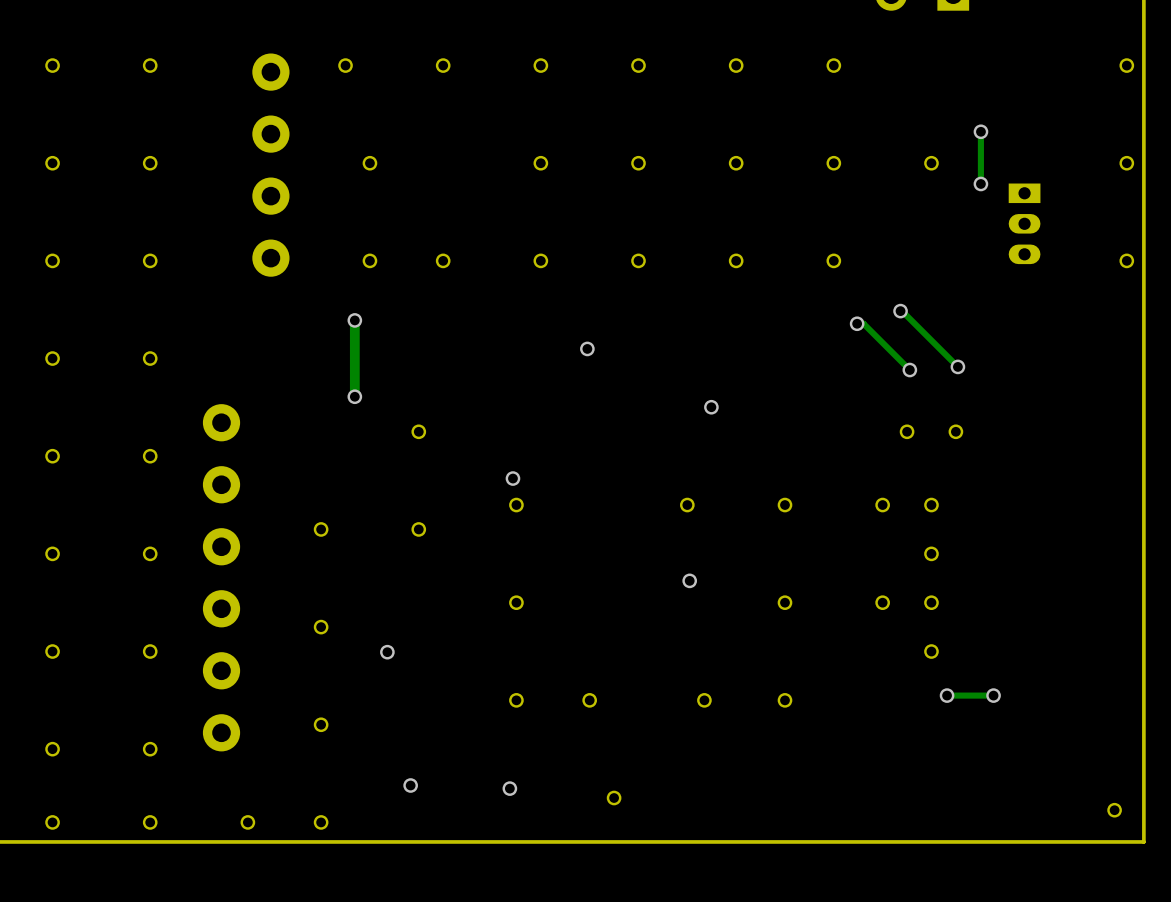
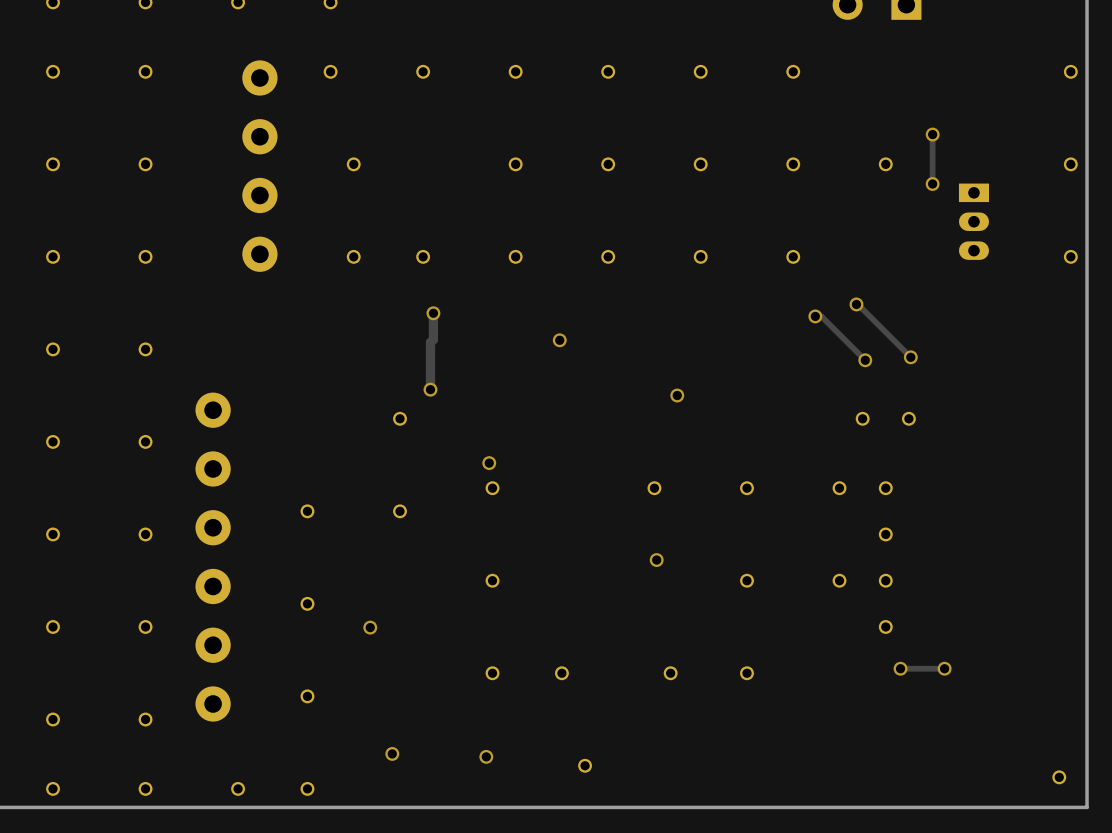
track: (354, 320) (354, 396) -> none
via: (354, 320) -> none
track: none -> (433, 313) (433, 339) (430, 342) (430, 389)
via: none -> (433, 313)
via: (354, 396) -> none
via: none -> (430, 389)

